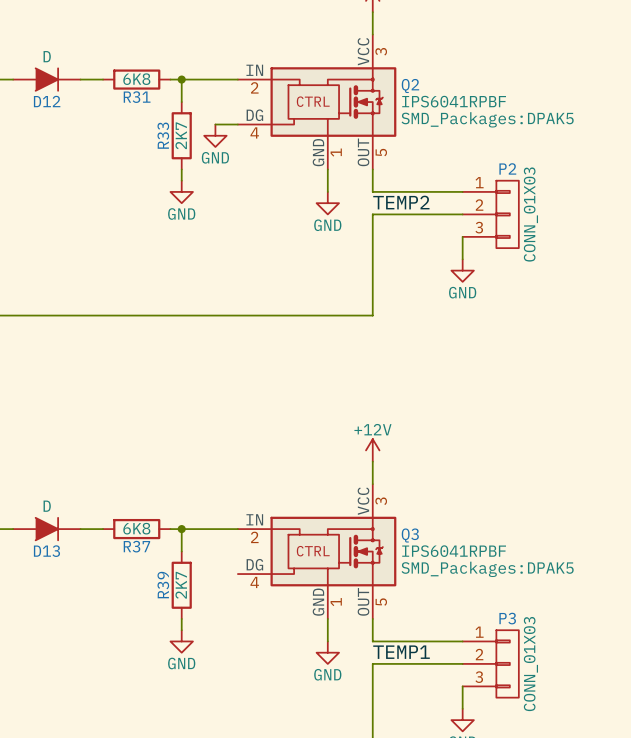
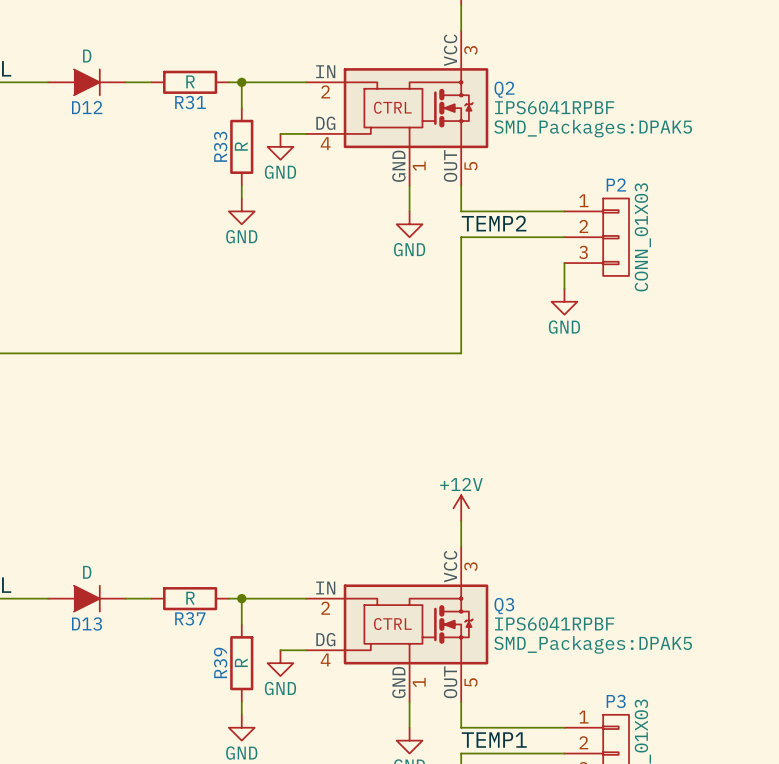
R31 value: 6K8 (136, 79) -> R (190, 81)
R33 value: 2K7 (181, 135) -> R (241, 146)
R37 value: 6K8 (136, 528) -> R (190, 598)
wire: none -> (280, 650) (306, 650)
R39 value: 2K7 (181, 585) -> R (241, 662)
power symbol: none -> GND (280, 663)

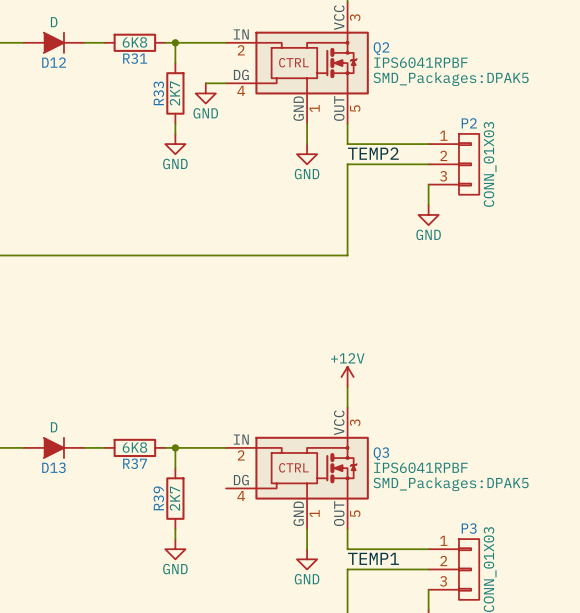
R31 value: R (190, 81) -> 6K8 (134, 42)
R33 value: R (241, 146) -> 2K7 (174, 93)
R37 value: R (190, 598) -> 6K8 (134, 447)
wire: (280, 650) (306, 650) -> none
R39 value: R (241, 662) -> 2K7 (174, 498)
power symbol: GND (280, 663) -> none

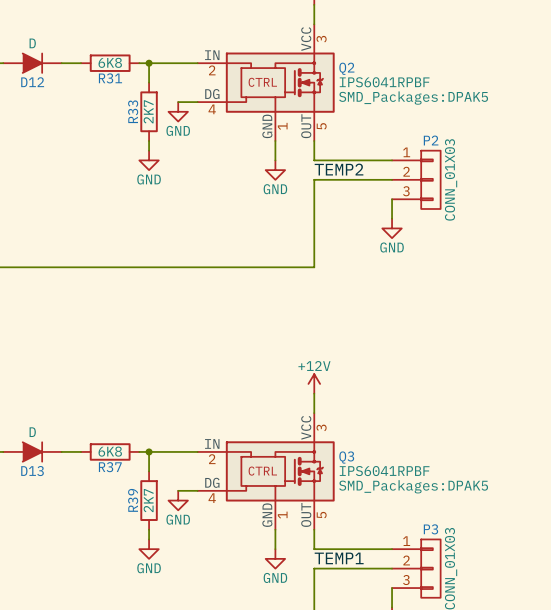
wire: none -> (178, 490) (197, 490)
power symbol: none -> GND (178, 500)

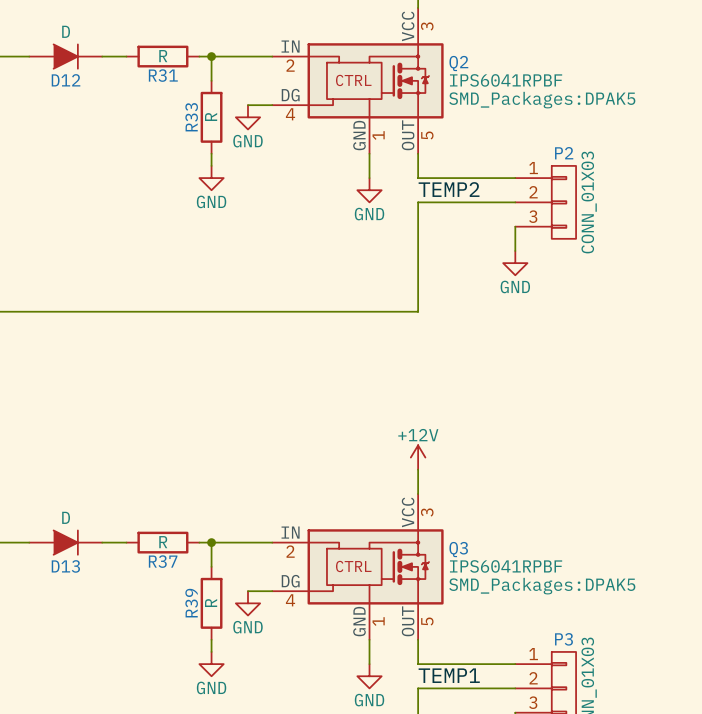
R31 value: 6K8 (110, 62) -> R (163, 56)
R33 value: 2K7 (148, 111) -> R (211, 116)
R37 value: 6K8 (110, 451) -> R (163, 542)
R39 value: 2K7 (148, 500) -> R (211, 603)

